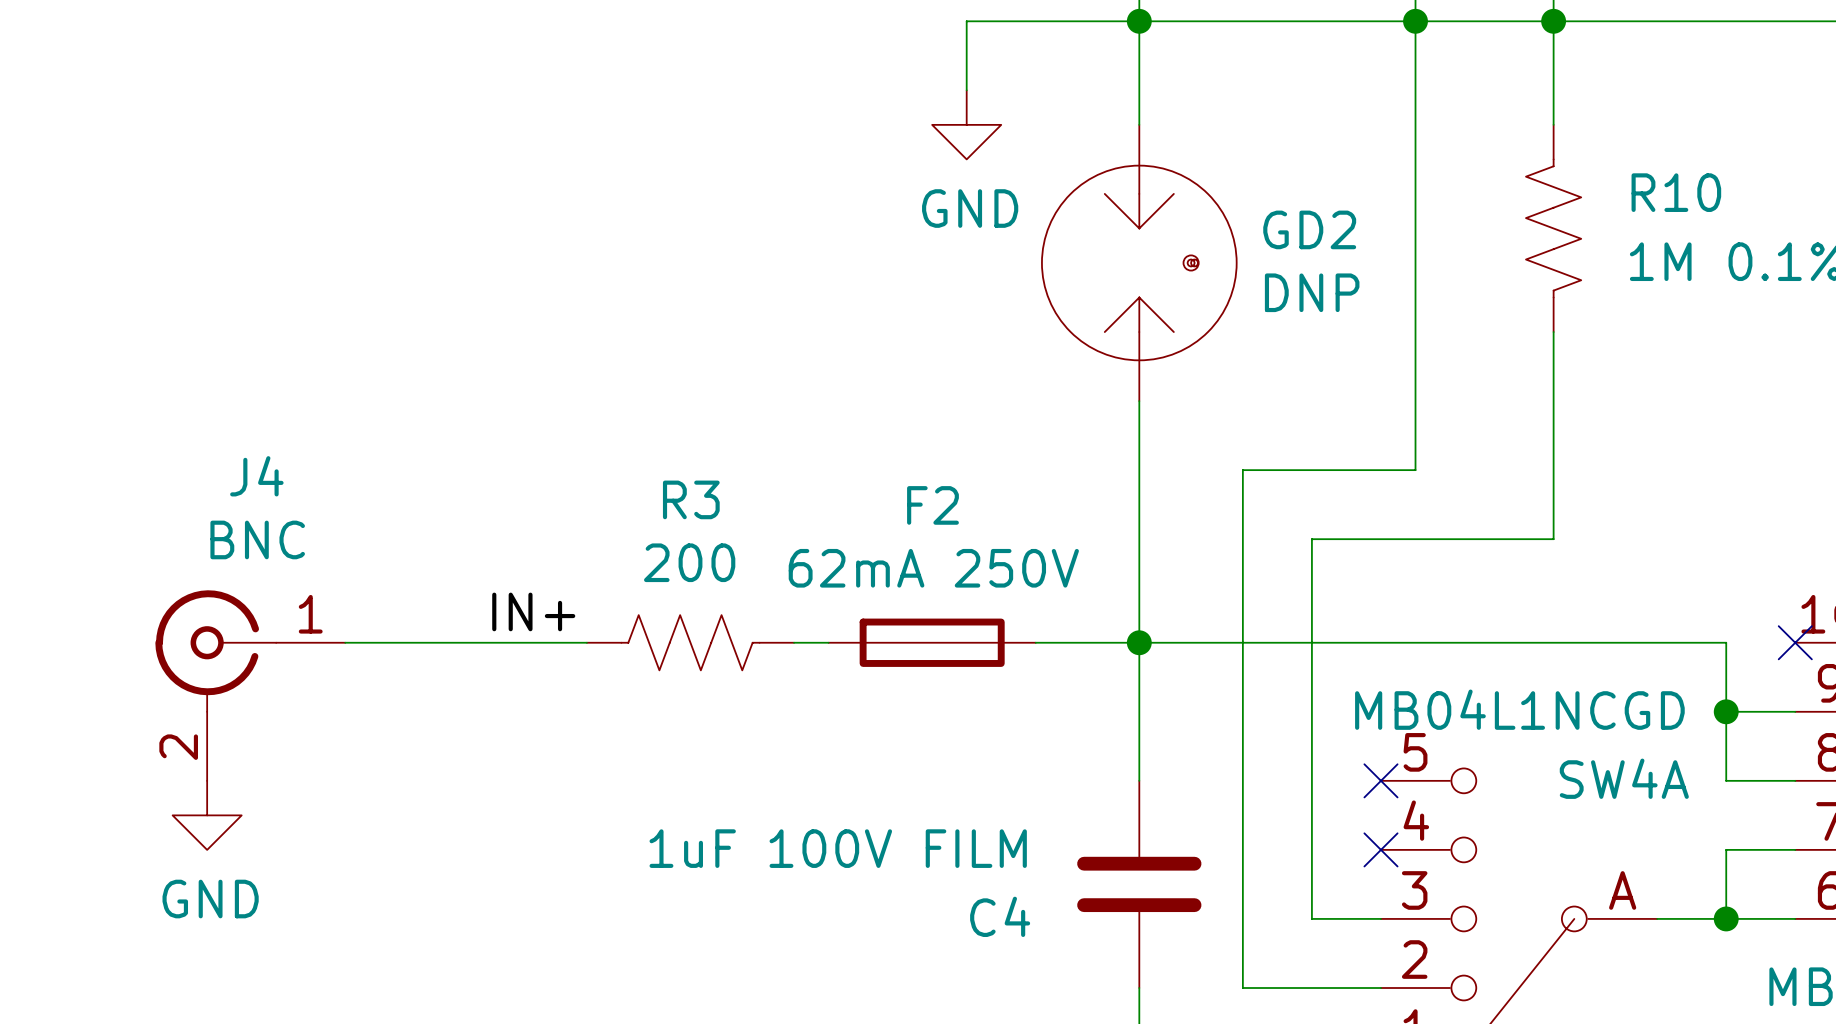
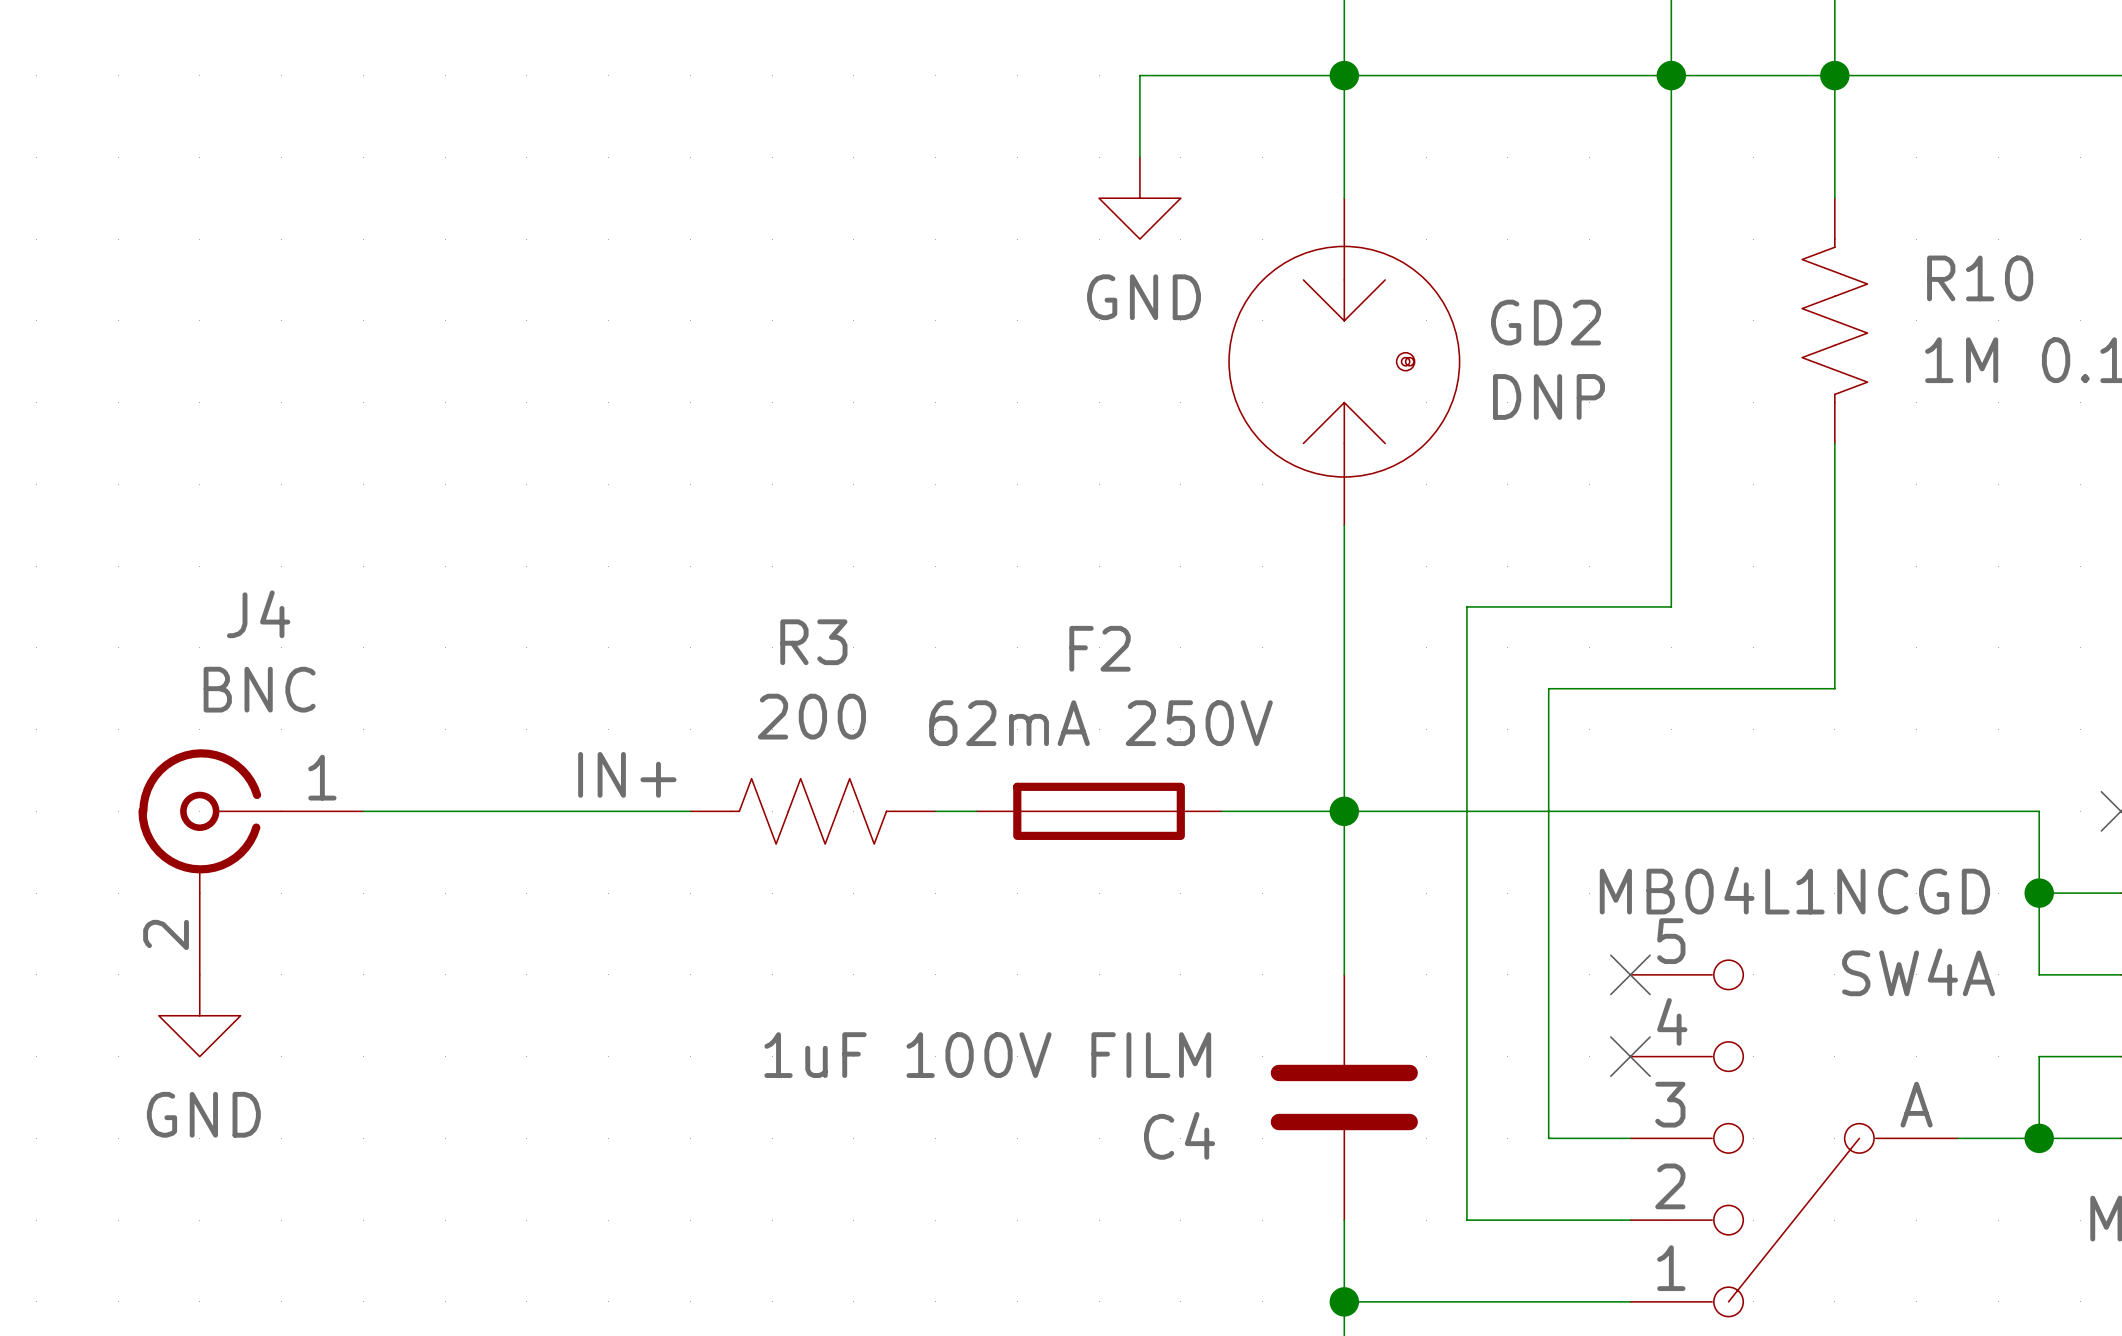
J4 position: (250, 685) -> (250, 862)
power symbol position: GND (207, 815) -> GND (199, 1015)

